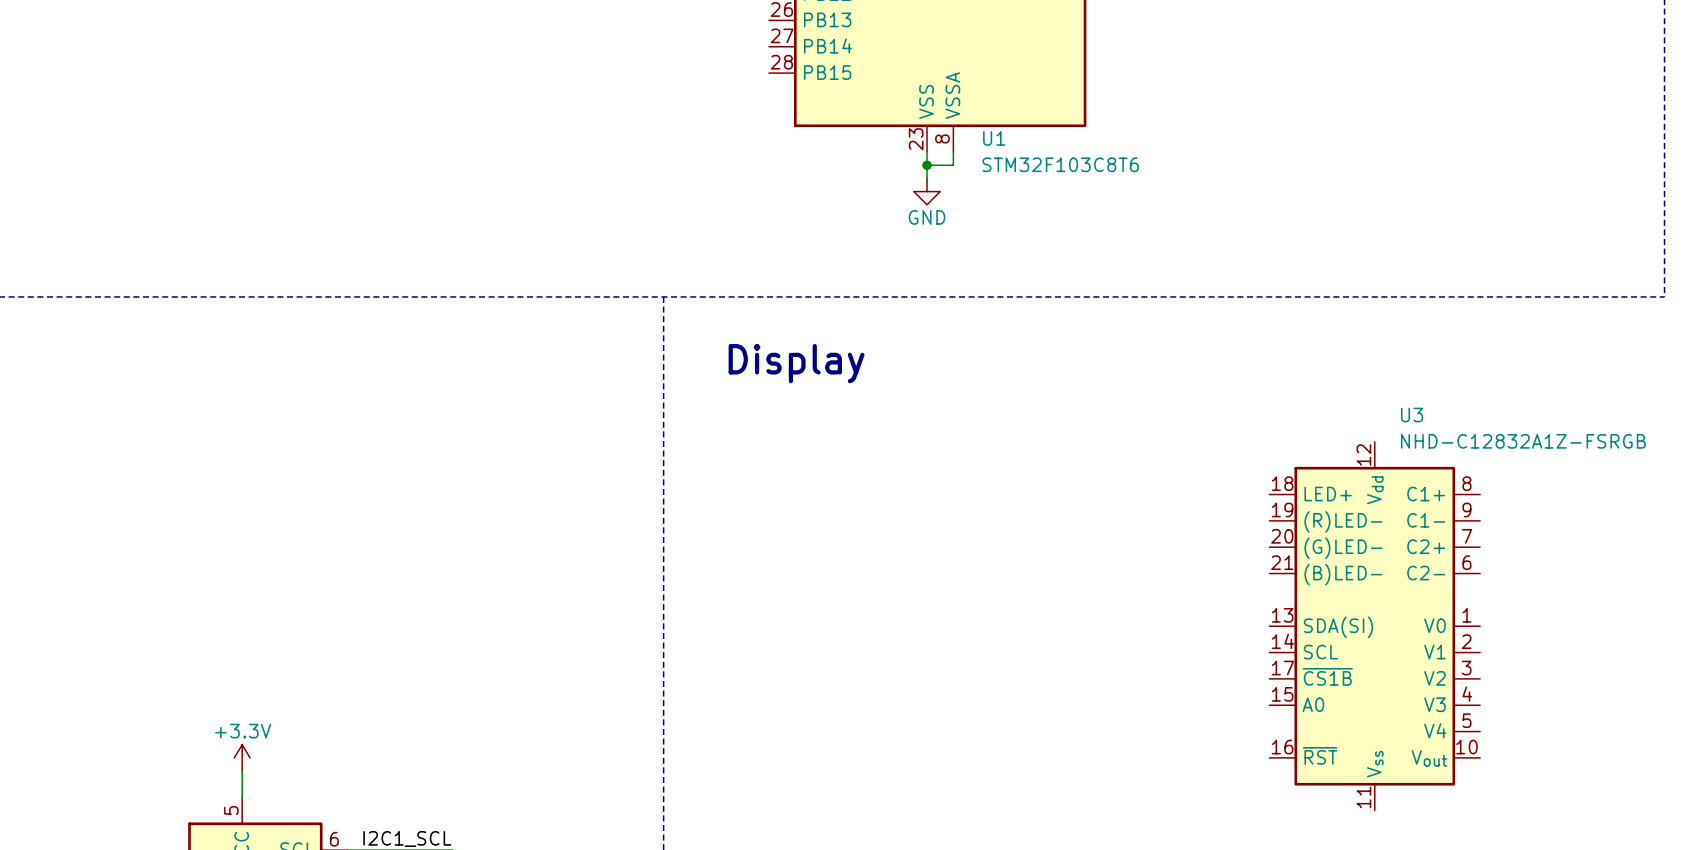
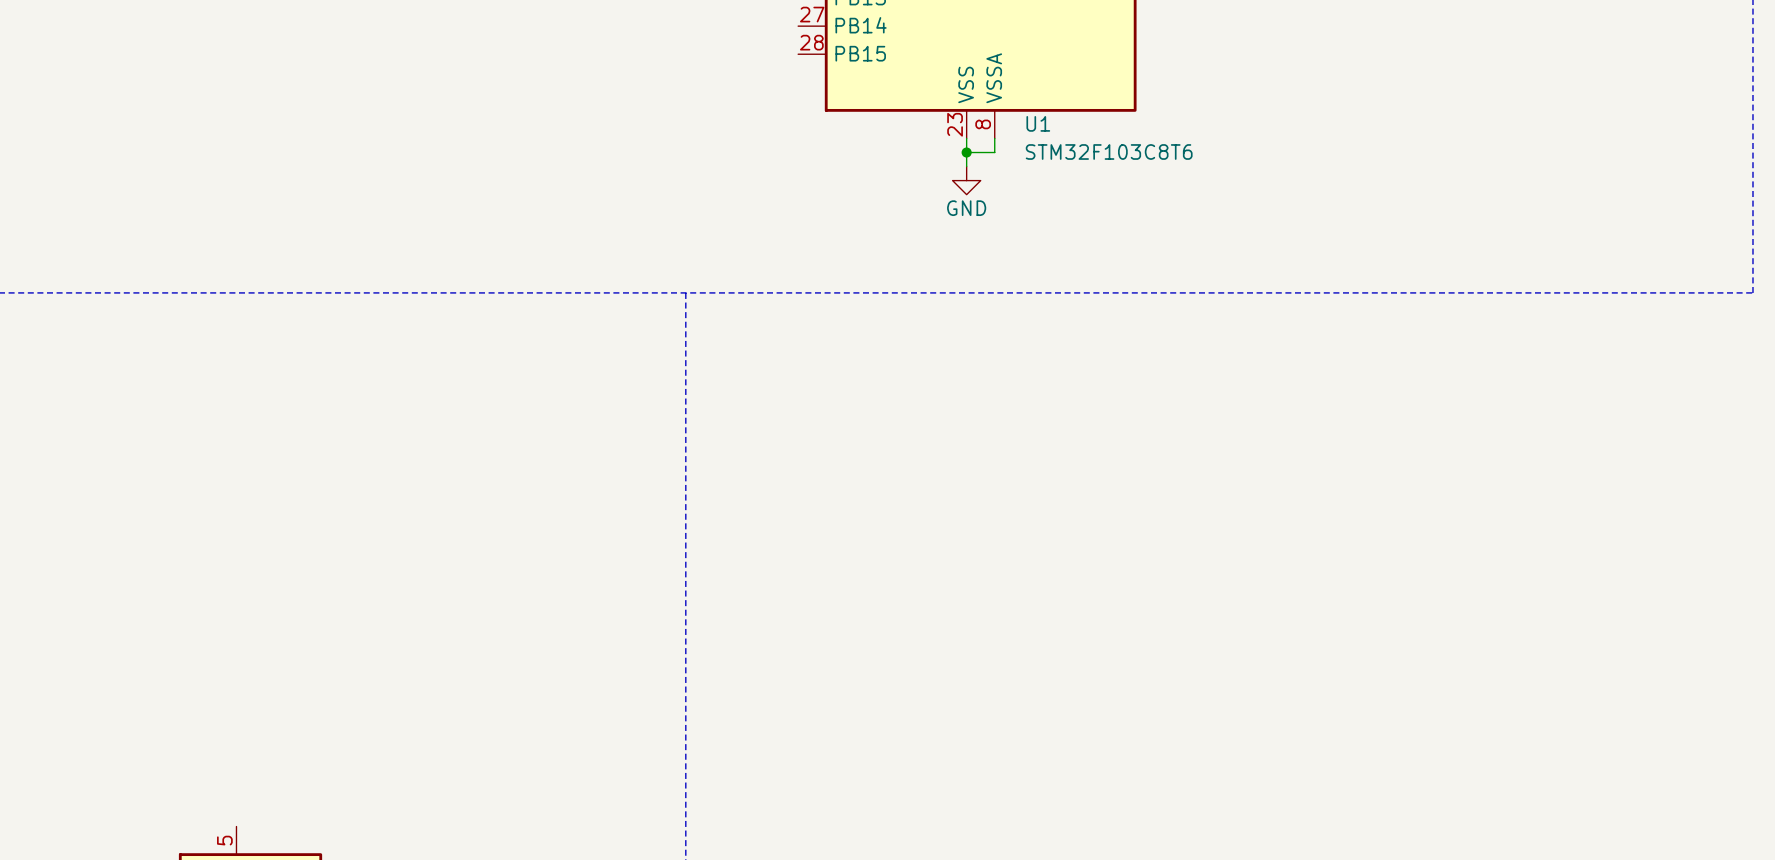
text: Display (796, 363) -> none
U3: NHD-C12832A1Z-FSRGB (1374, 626) -> none
power symbol: +3.3V (242, 757) -> none
wire: (242, 771) (242, 797) -> none

